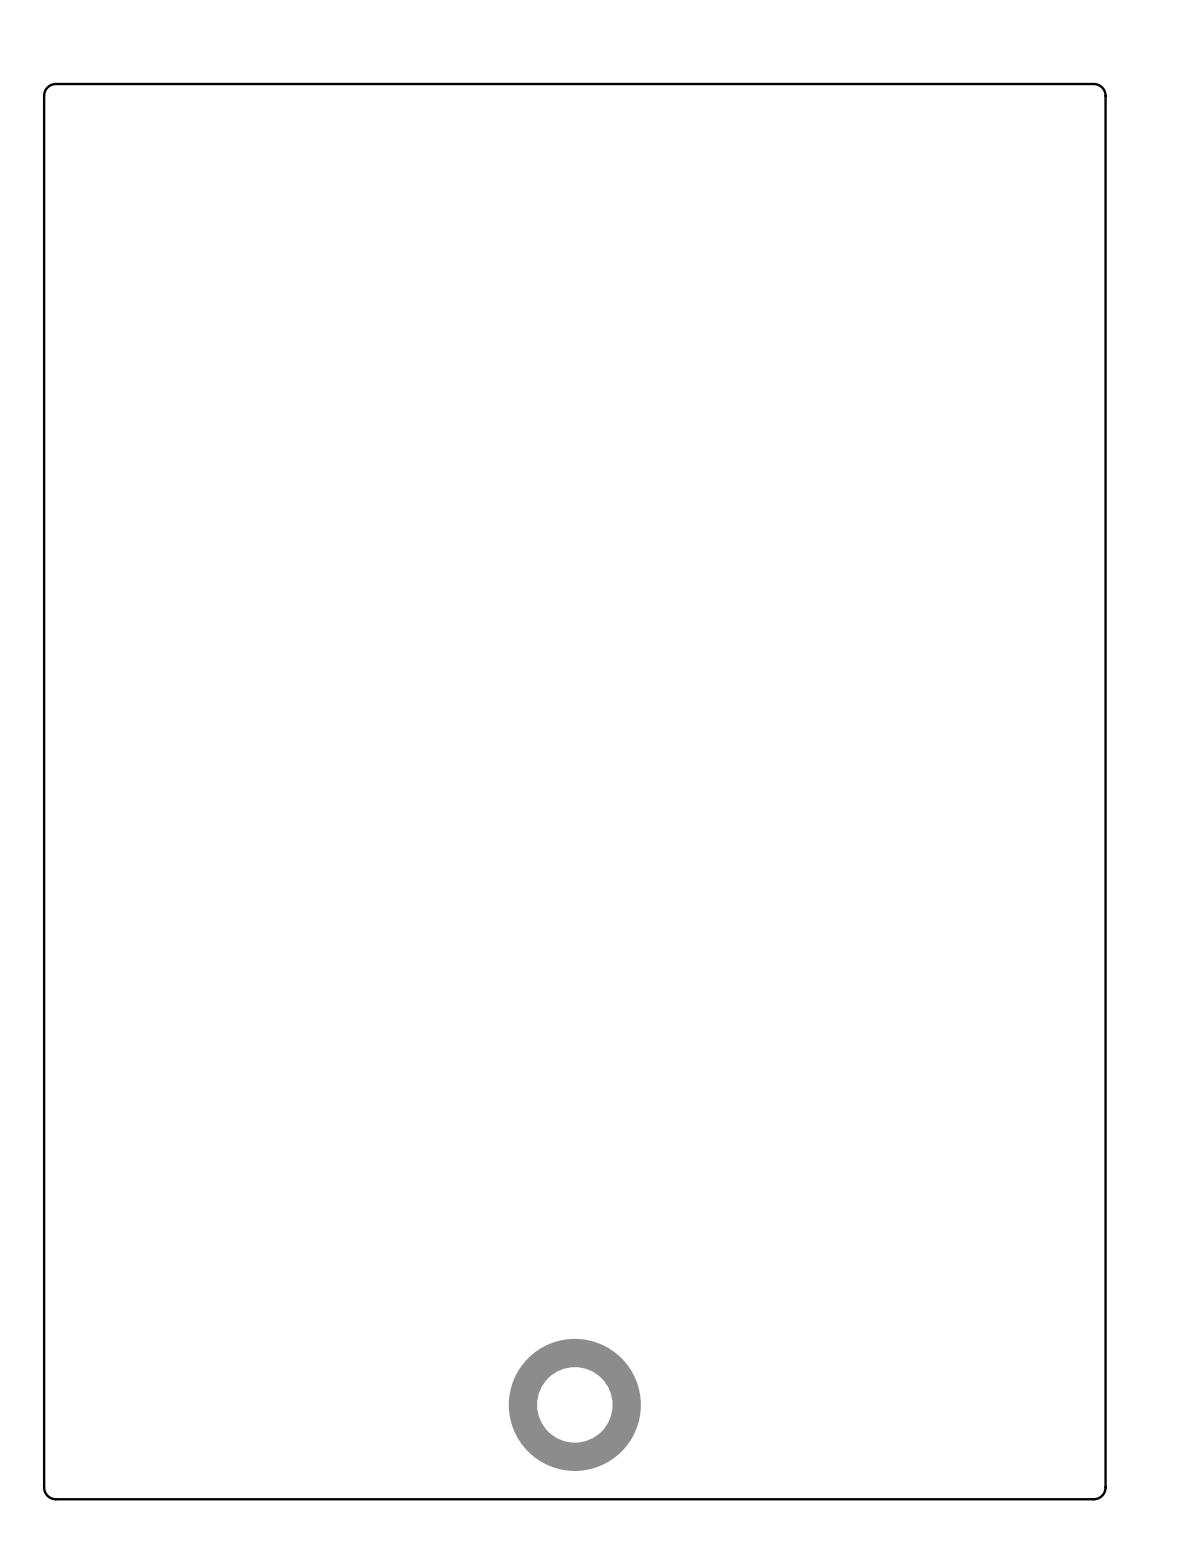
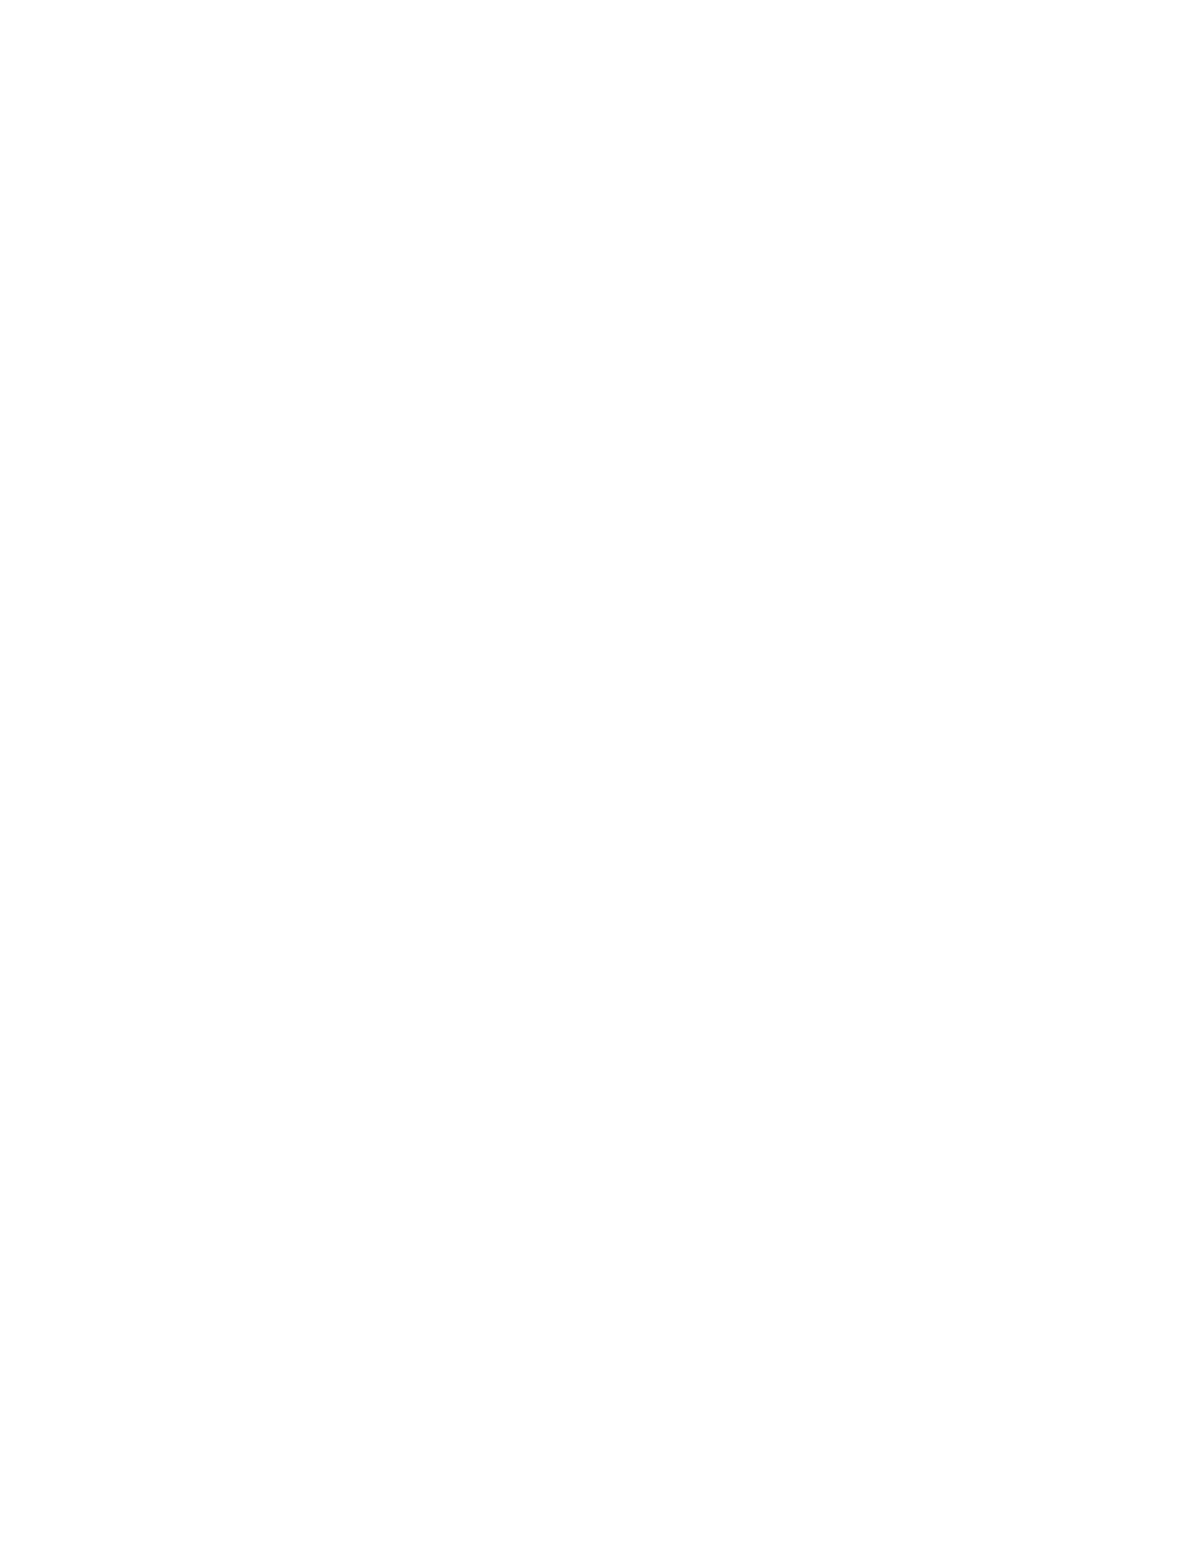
board edge: (1093, 84) (55, 84) (46, 88) (44, 95) (44, 1487) (48, 1496) (55, 1499) (1093, 1499) (1103, 1494) (1105, 1487) (1105, 95) (1102, 87) (1093, 84) -> none
part: (574, 1404) -> none

